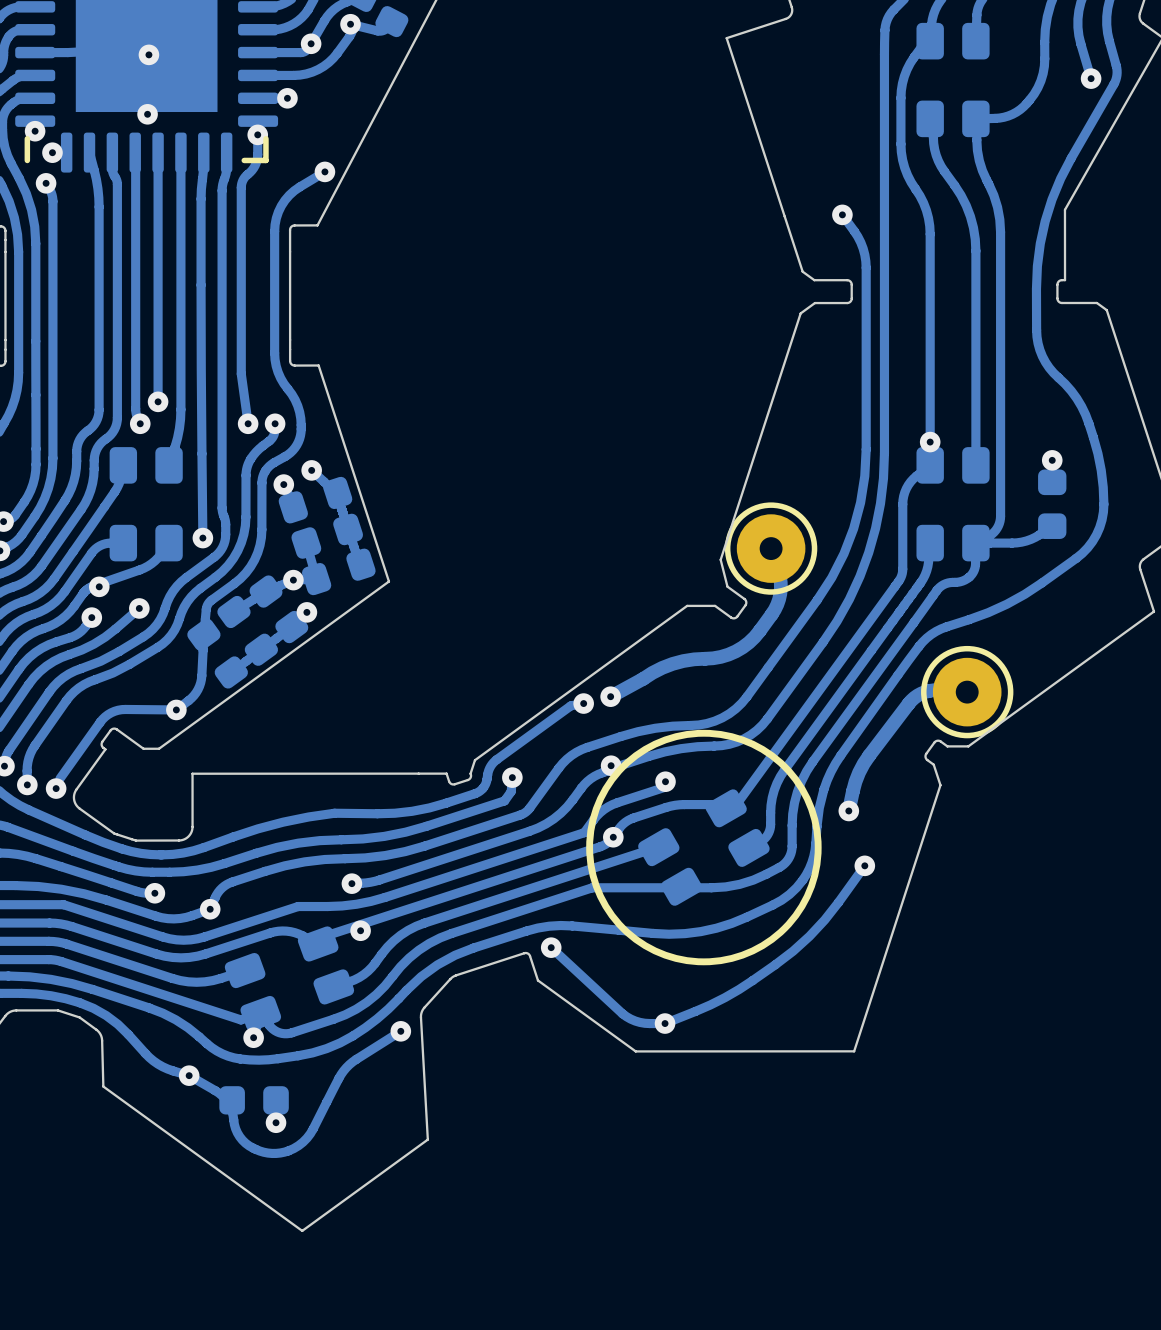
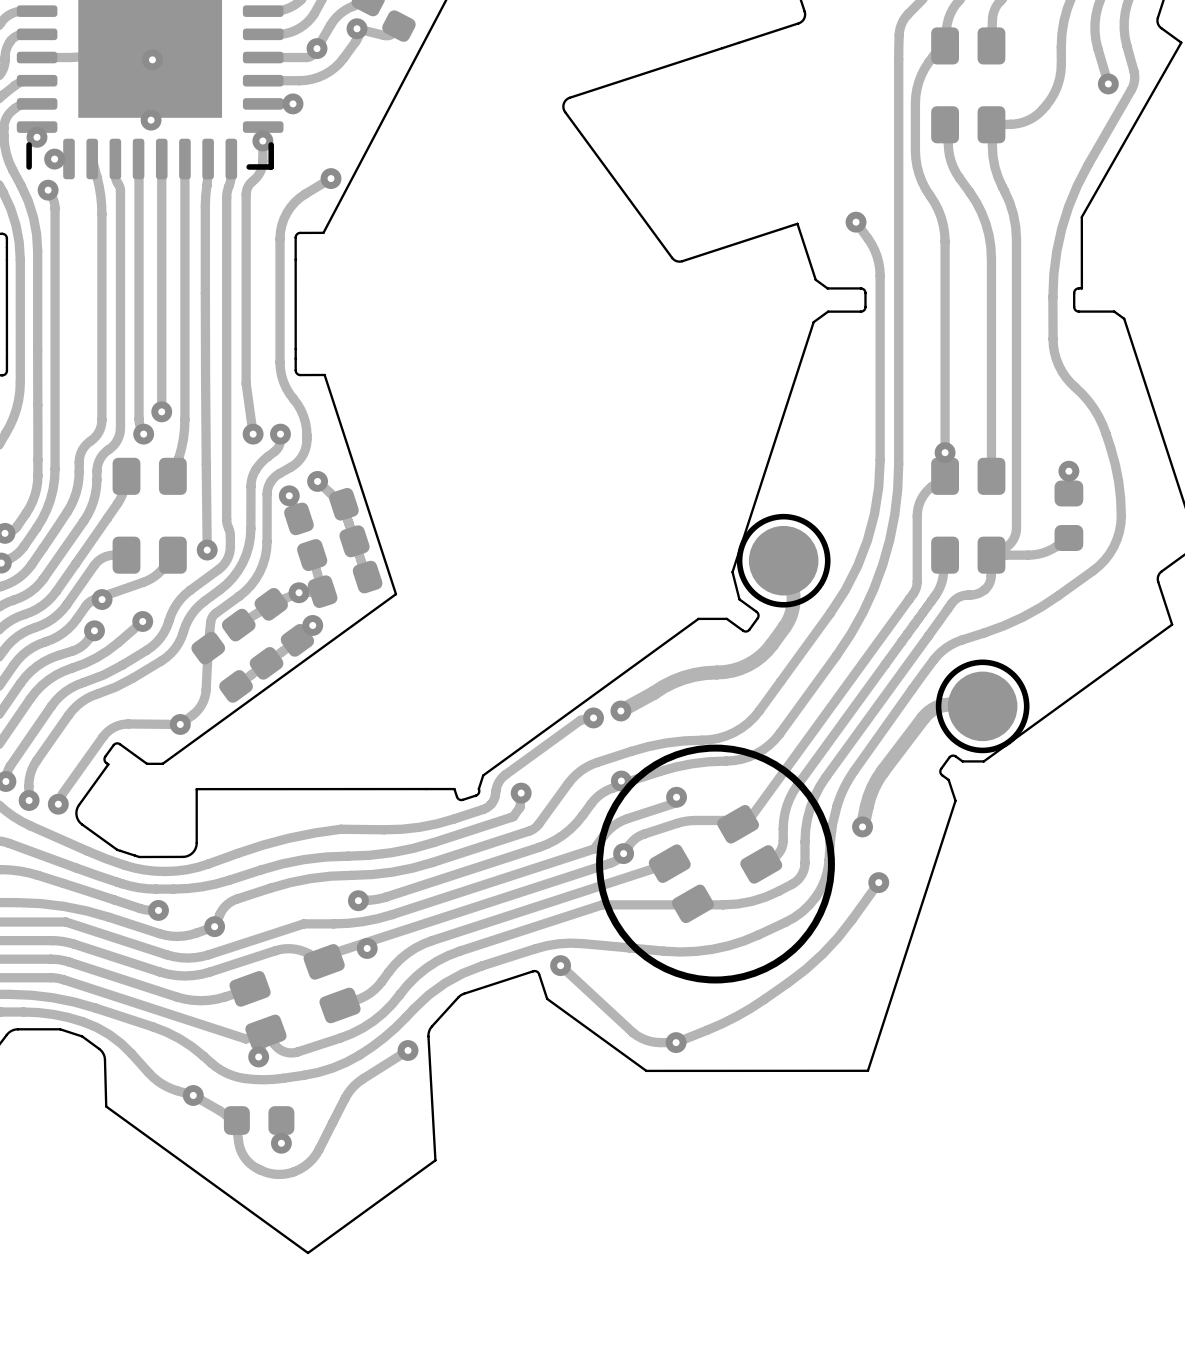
board edge: (726, 38) (784, 216) -> (738, 42) (569, 97) (564, 101) (563, 109) (675, 260) (682, 261) (797, 223)
part footprint: [724, 502, 818, 595] -> [736, 513, 831, 608]
part footprint: [921, 645, 1014, 739] -> [935, 659, 1030, 754]

